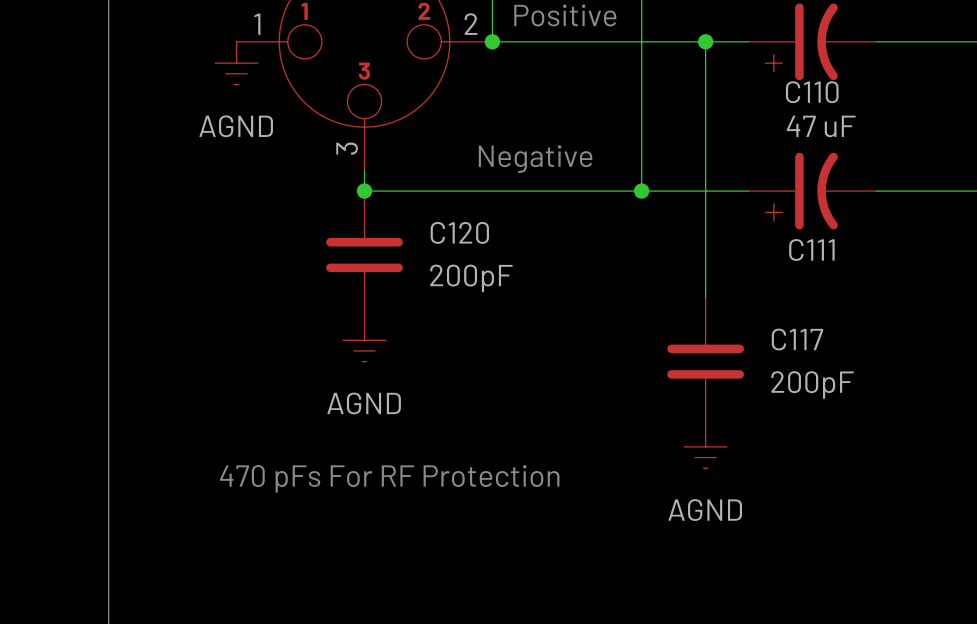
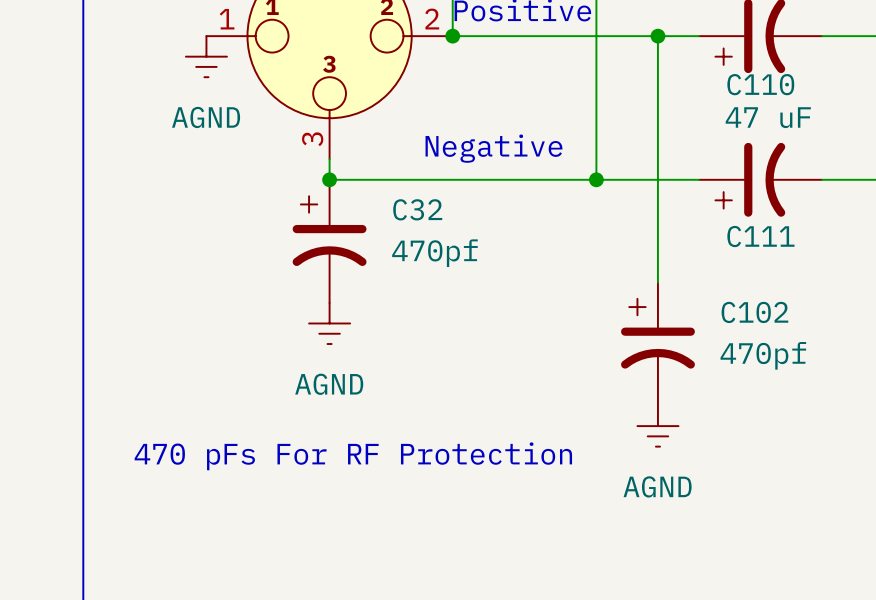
C120: 200pF (364, 255) -> none
C32: none -> 470pf (329, 241)
C117: 200pF (705, 361) -> none
C102: none -> 470pf (657, 344)

